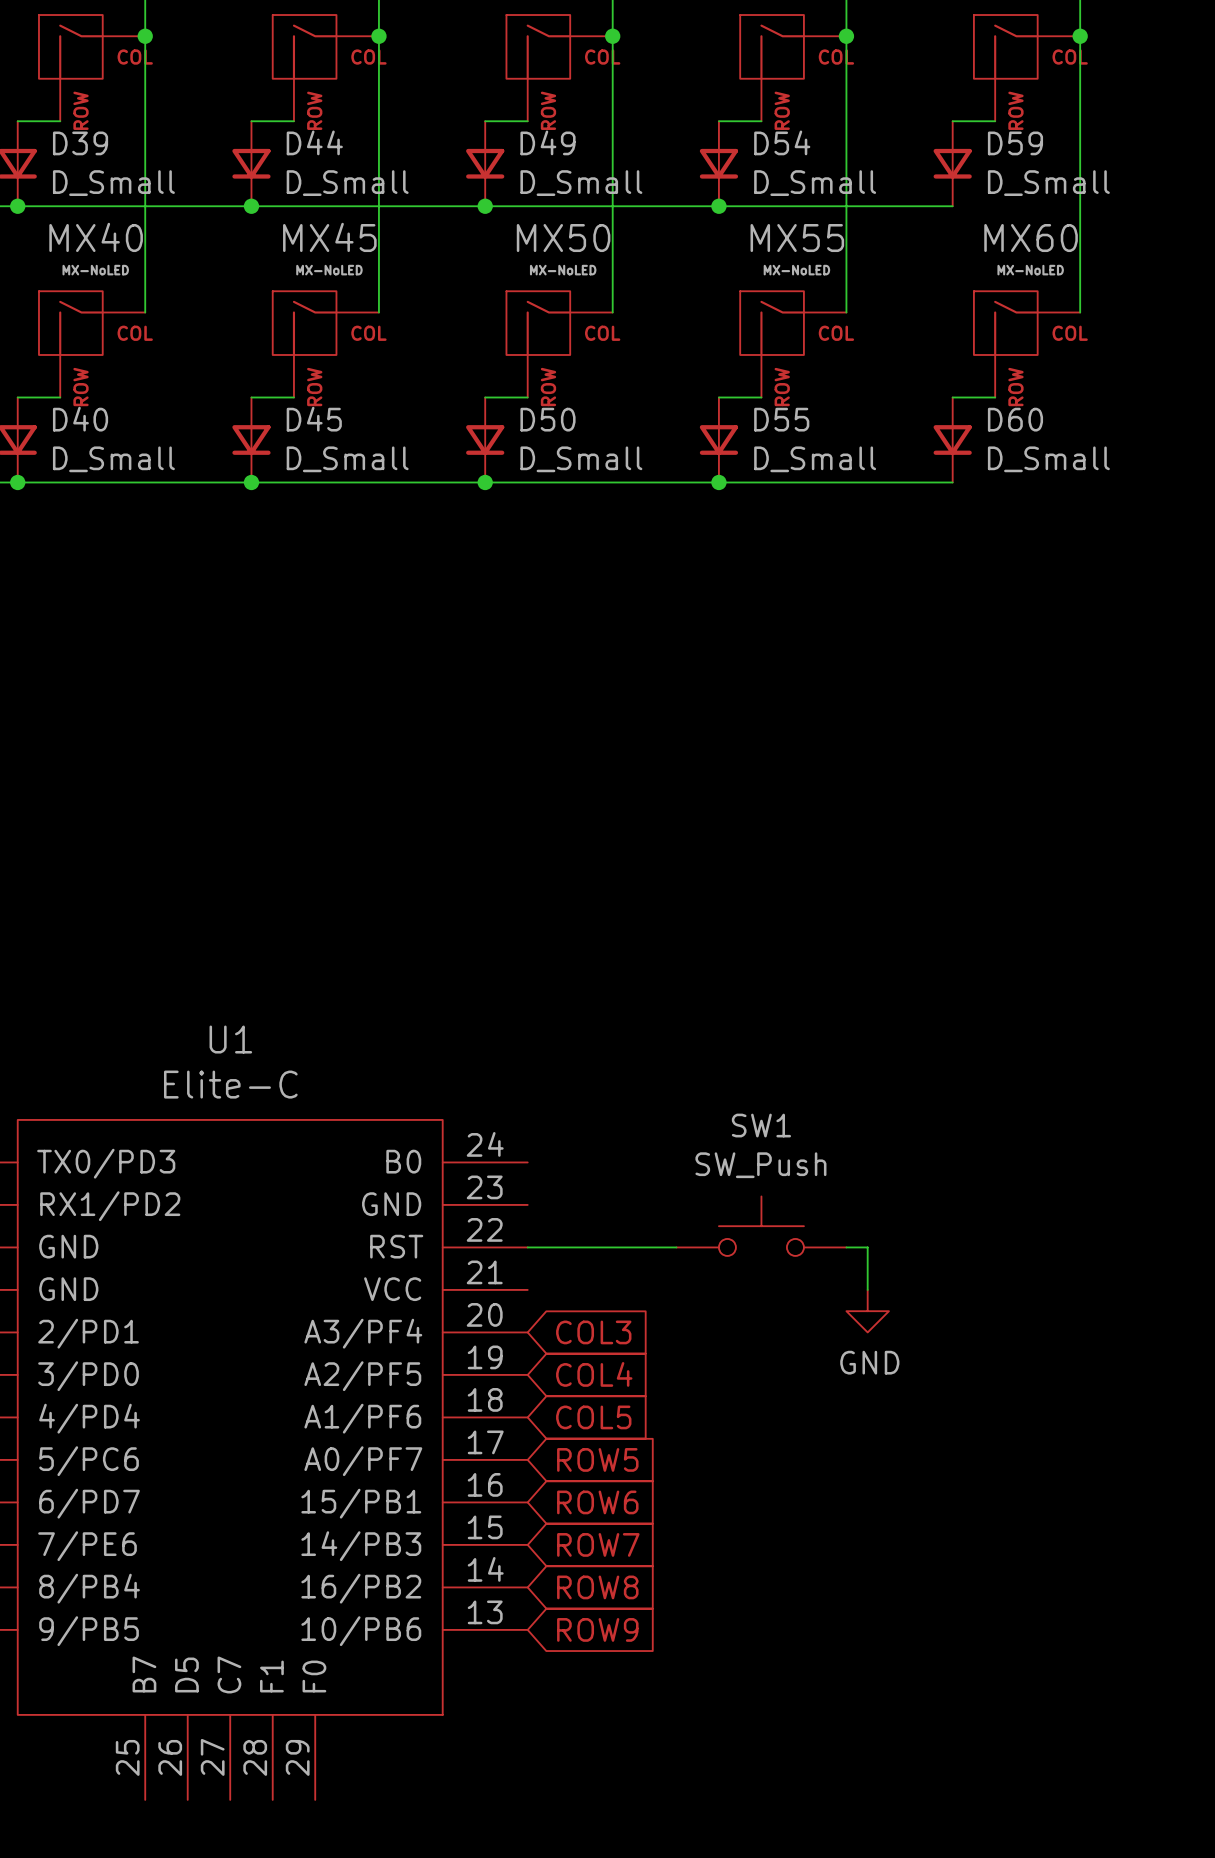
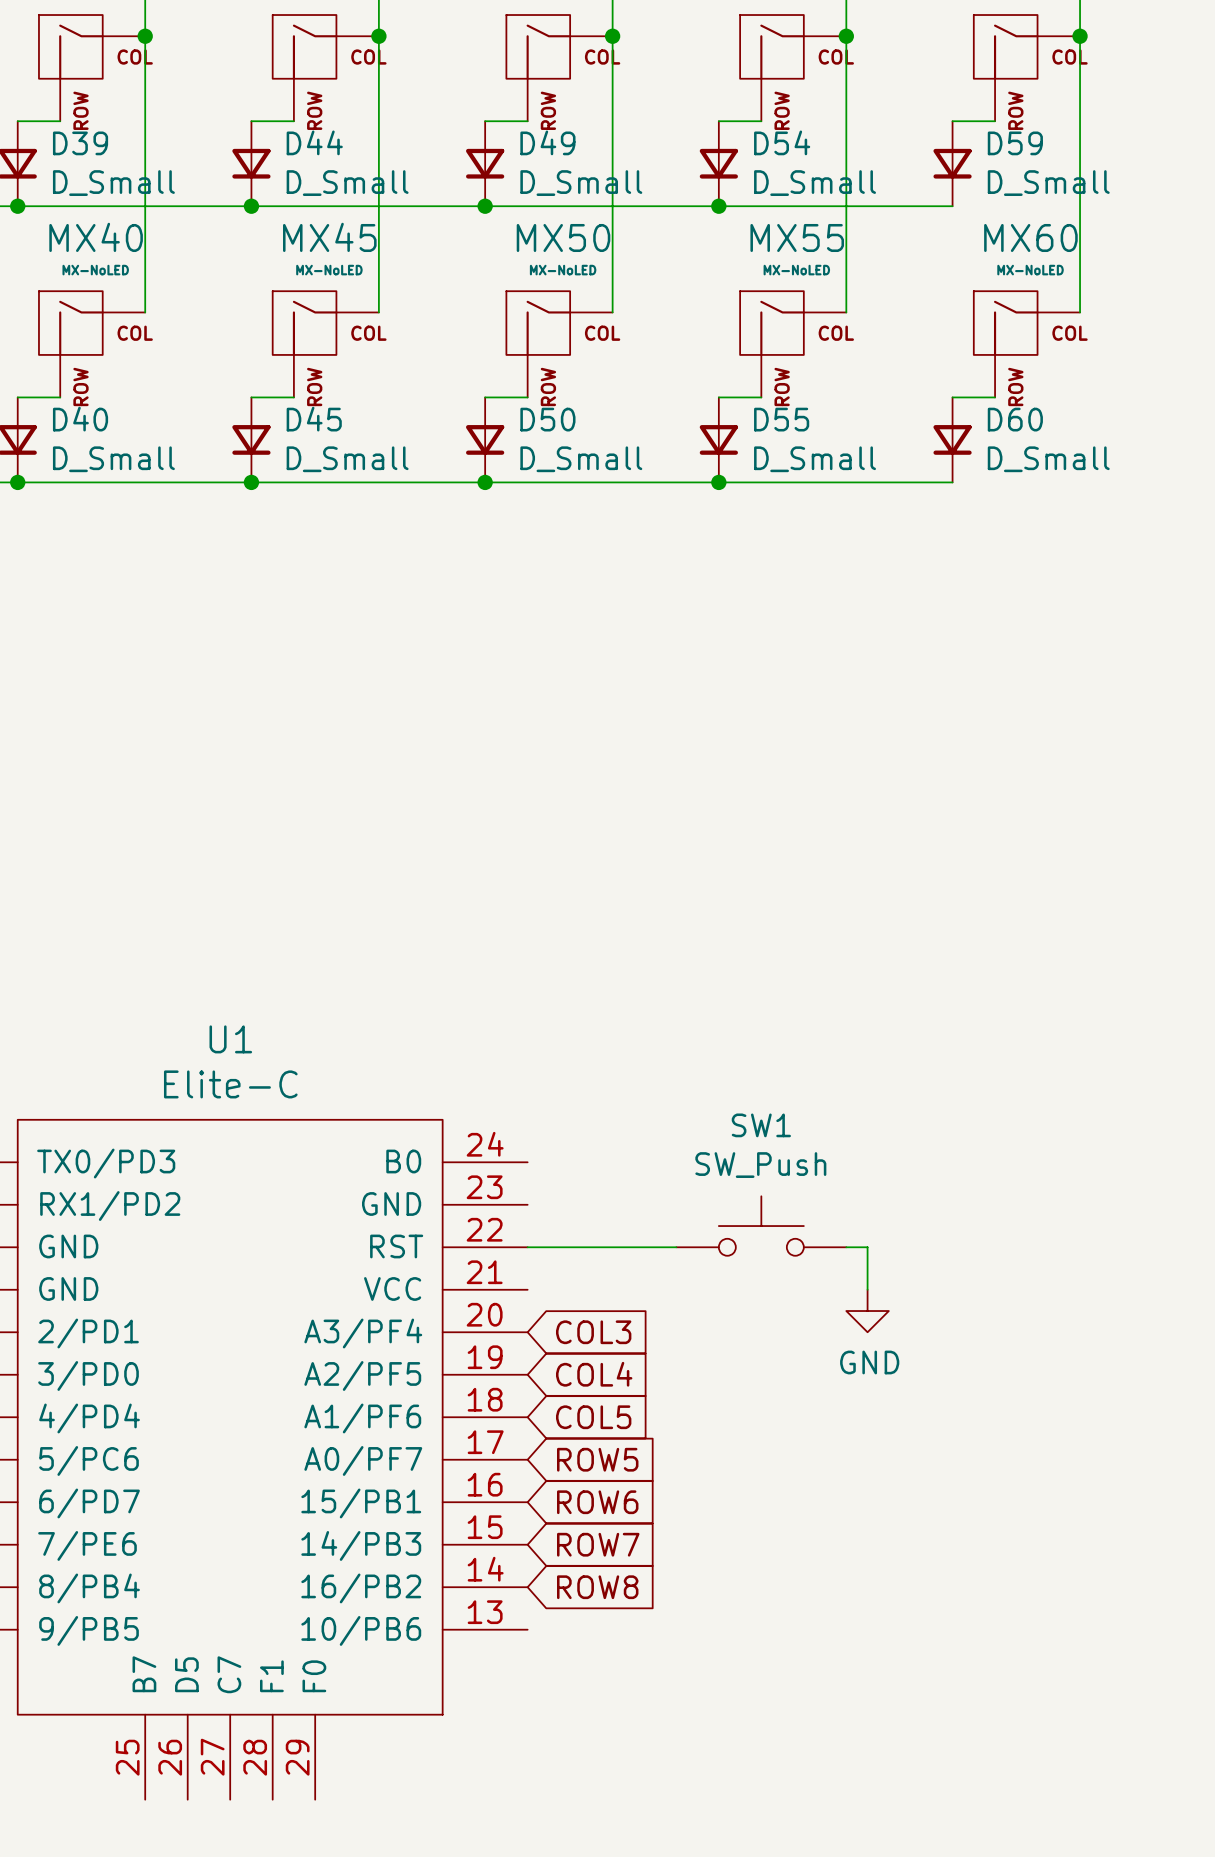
global label: ROW9 (597, 1629) -> none

